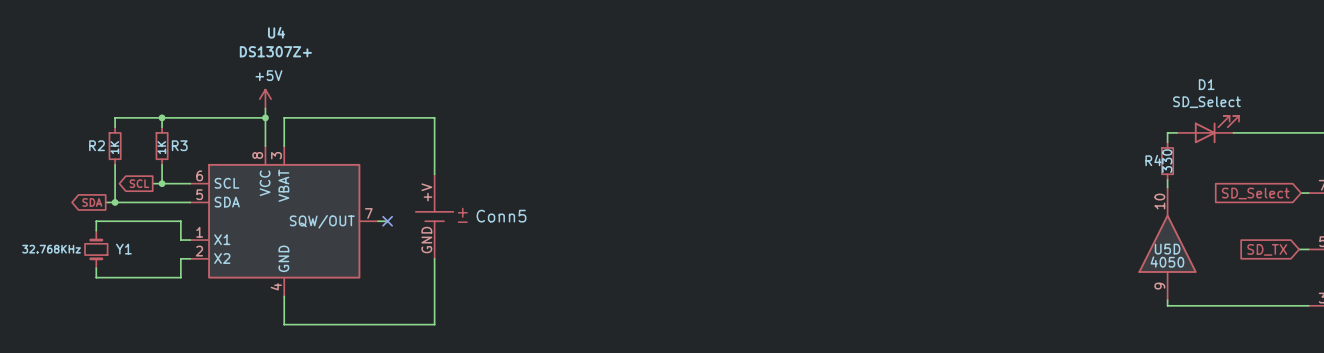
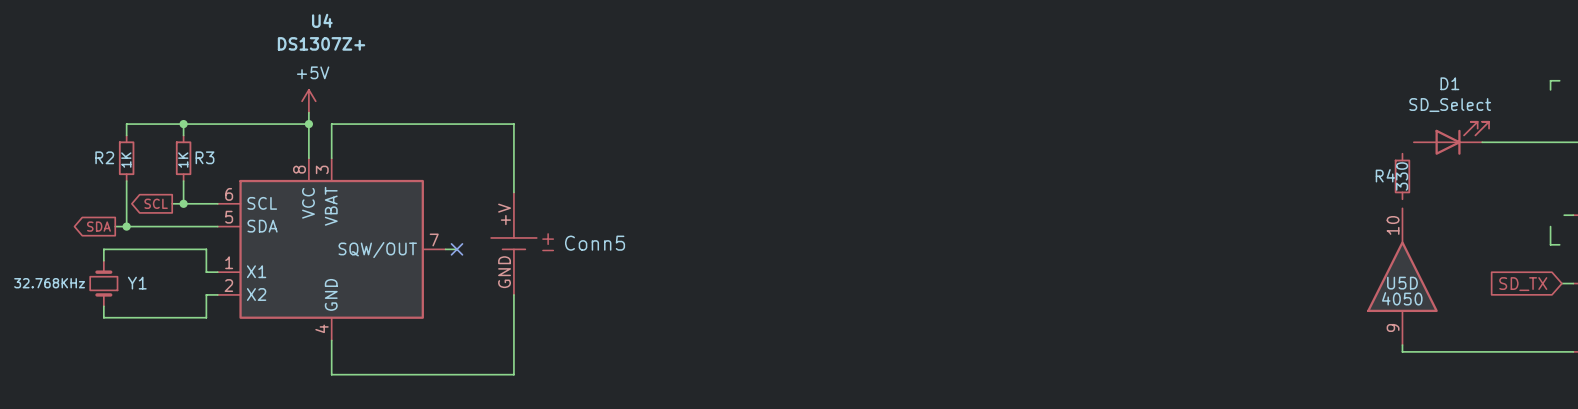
wire: none -> (1559, 80) (1550, 80) (1550, 89)
wire: (1176, 132) (1167, 132) (1167, 142) -> none
wire: (1167, 179) (1167, 187) -> none
global label: SD_Select (1255, 193) -> none
wire: none -> (1550, 226) (1550, 244) (1559, 244)

